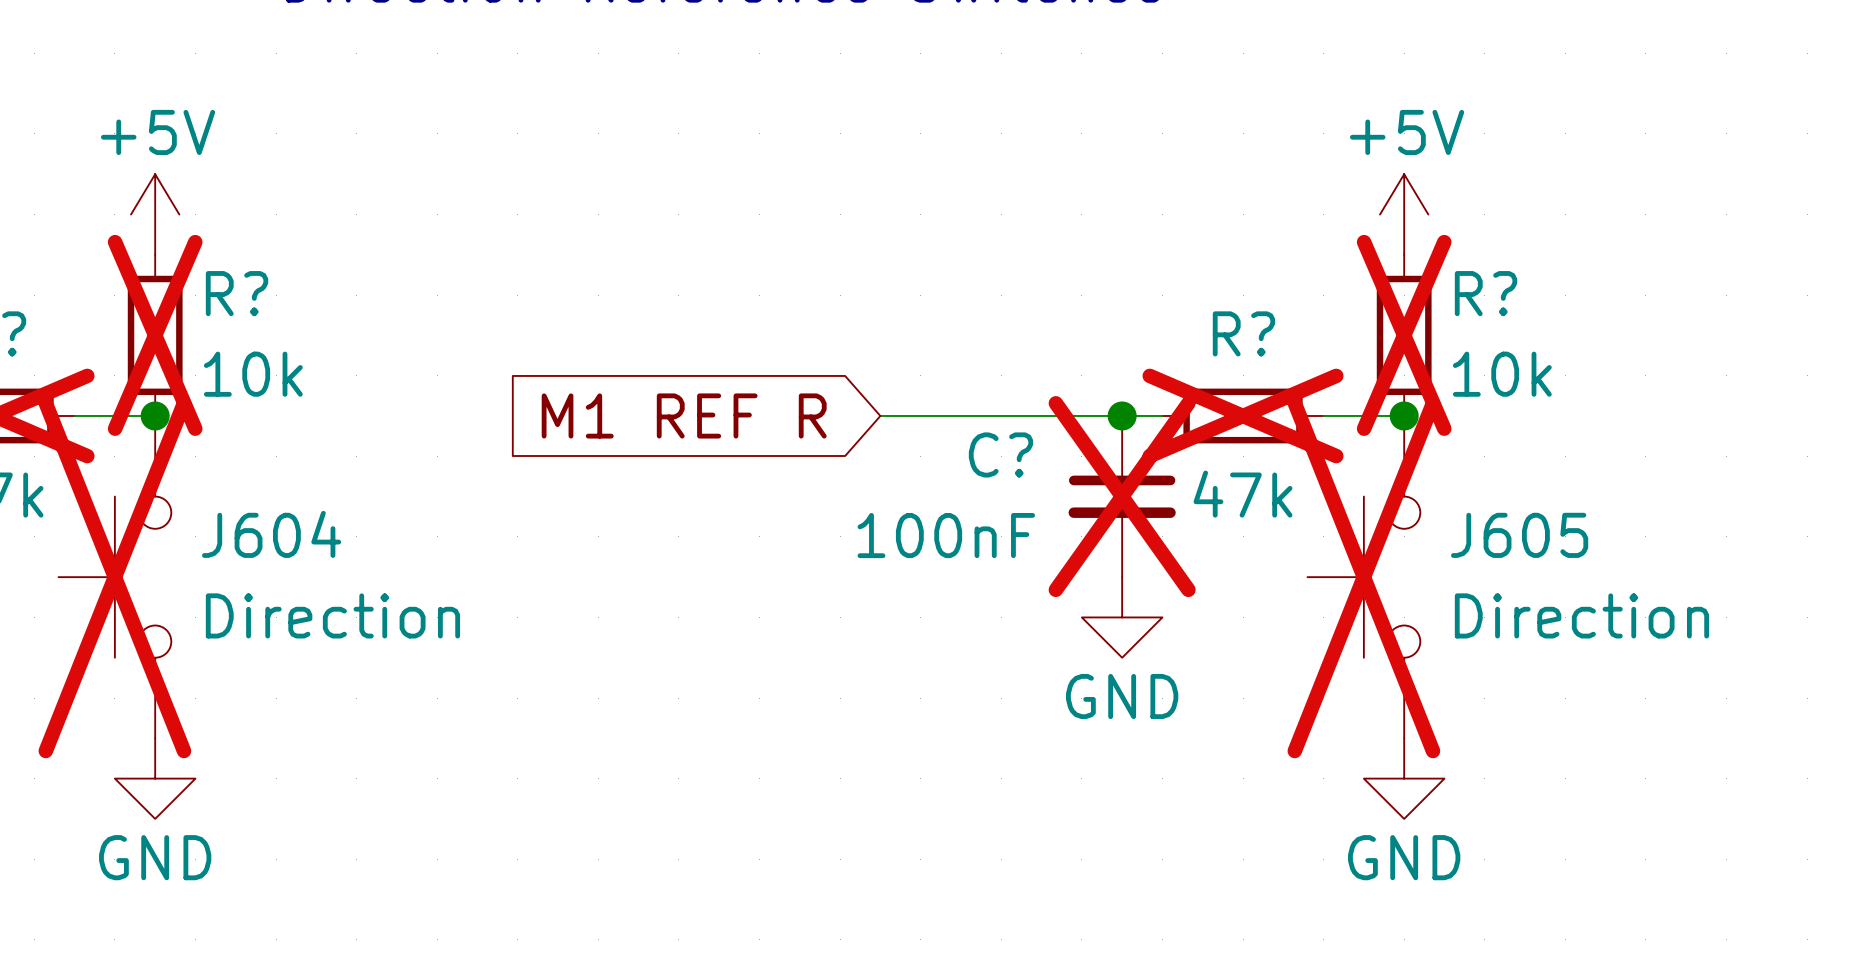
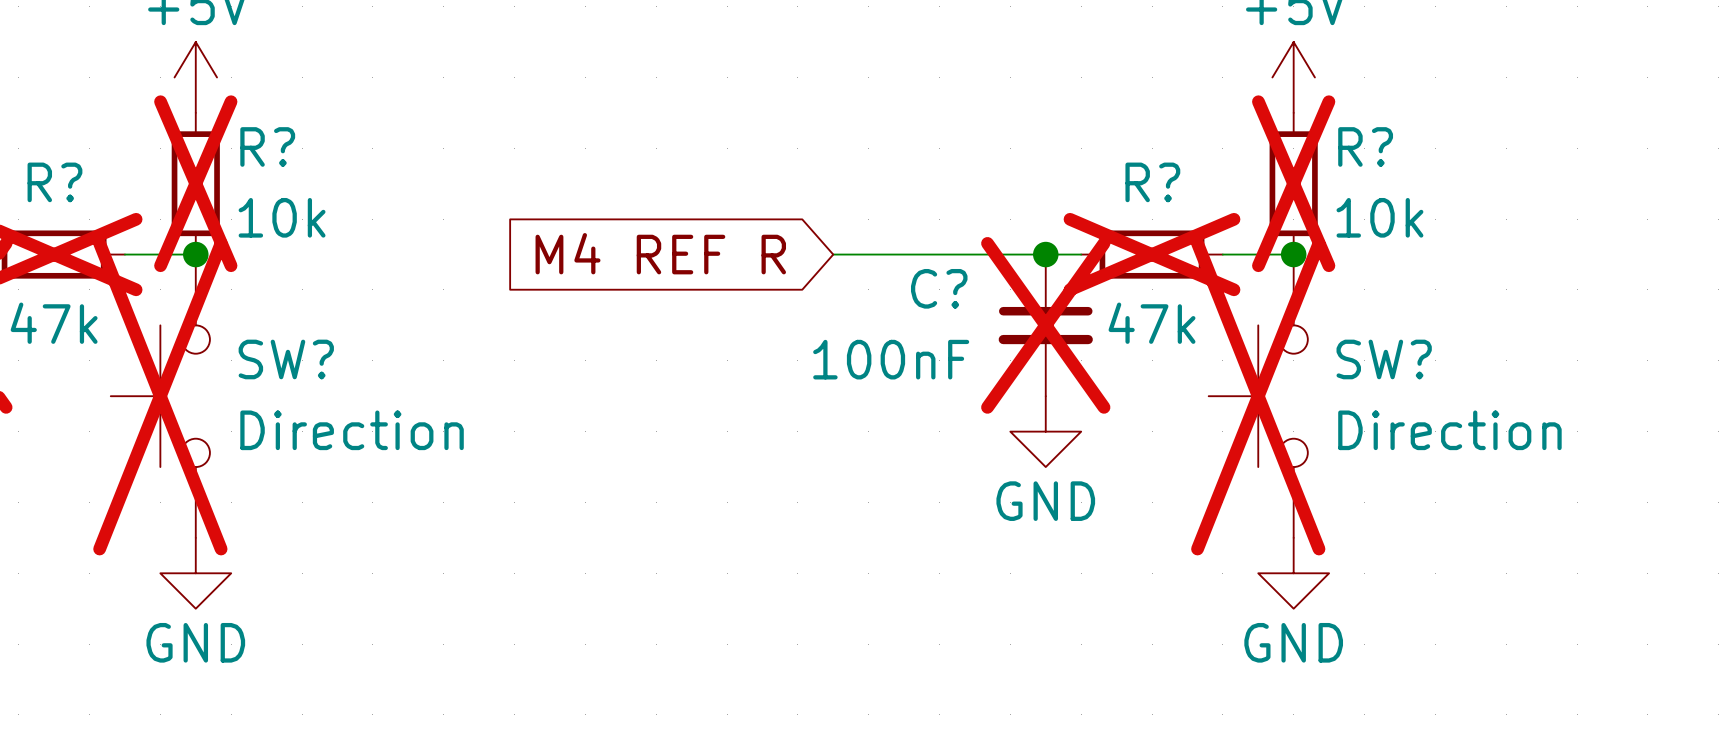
global label: M1 REF R (684, 415) -> M4 REF R (660, 253)
J604 name: J604 (271, 534) -> SW? (286, 359)
J605 name: J605 (1519, 535) -> SW? (1384, 359)

